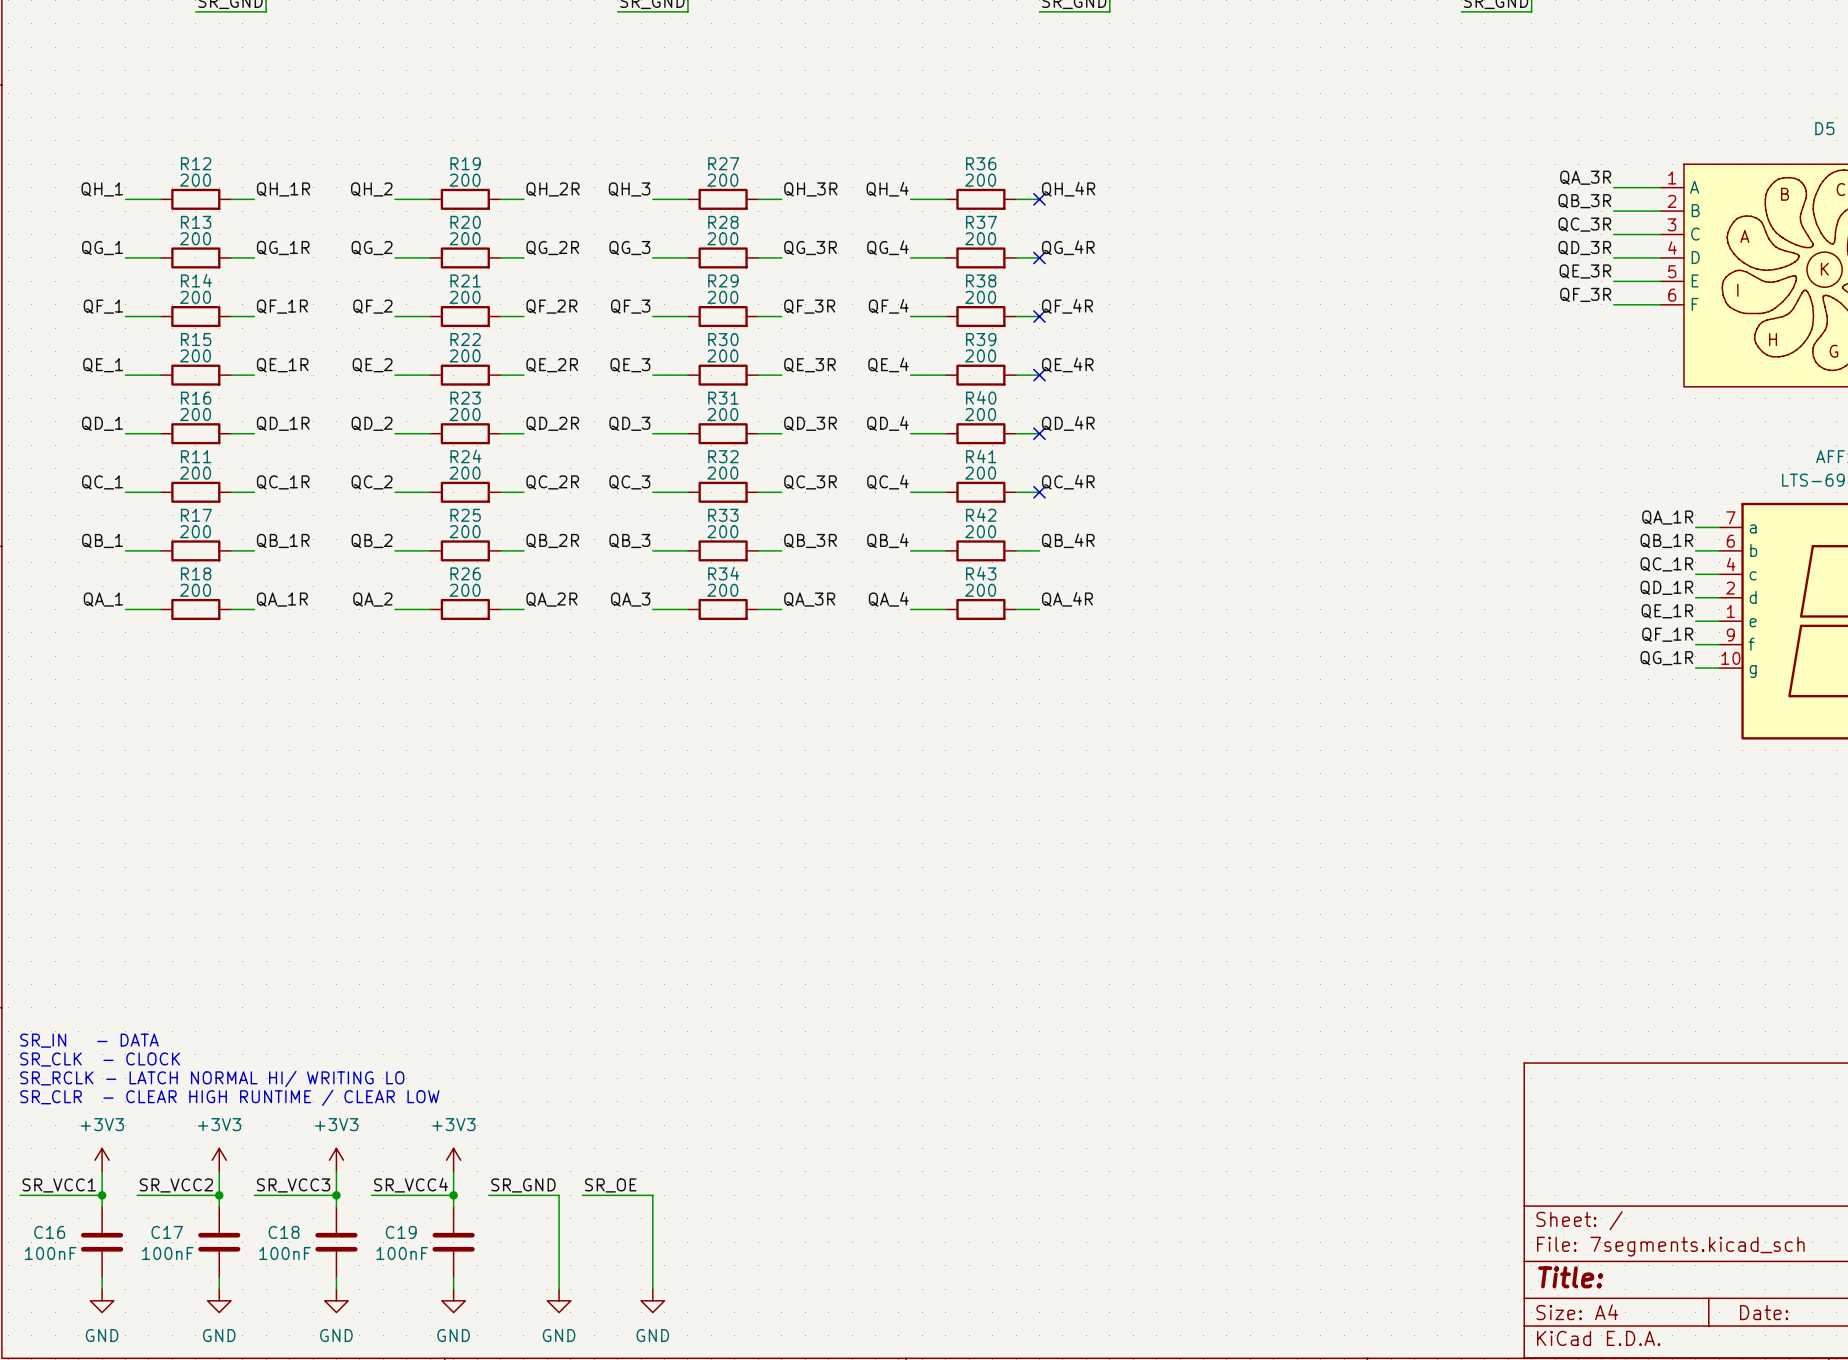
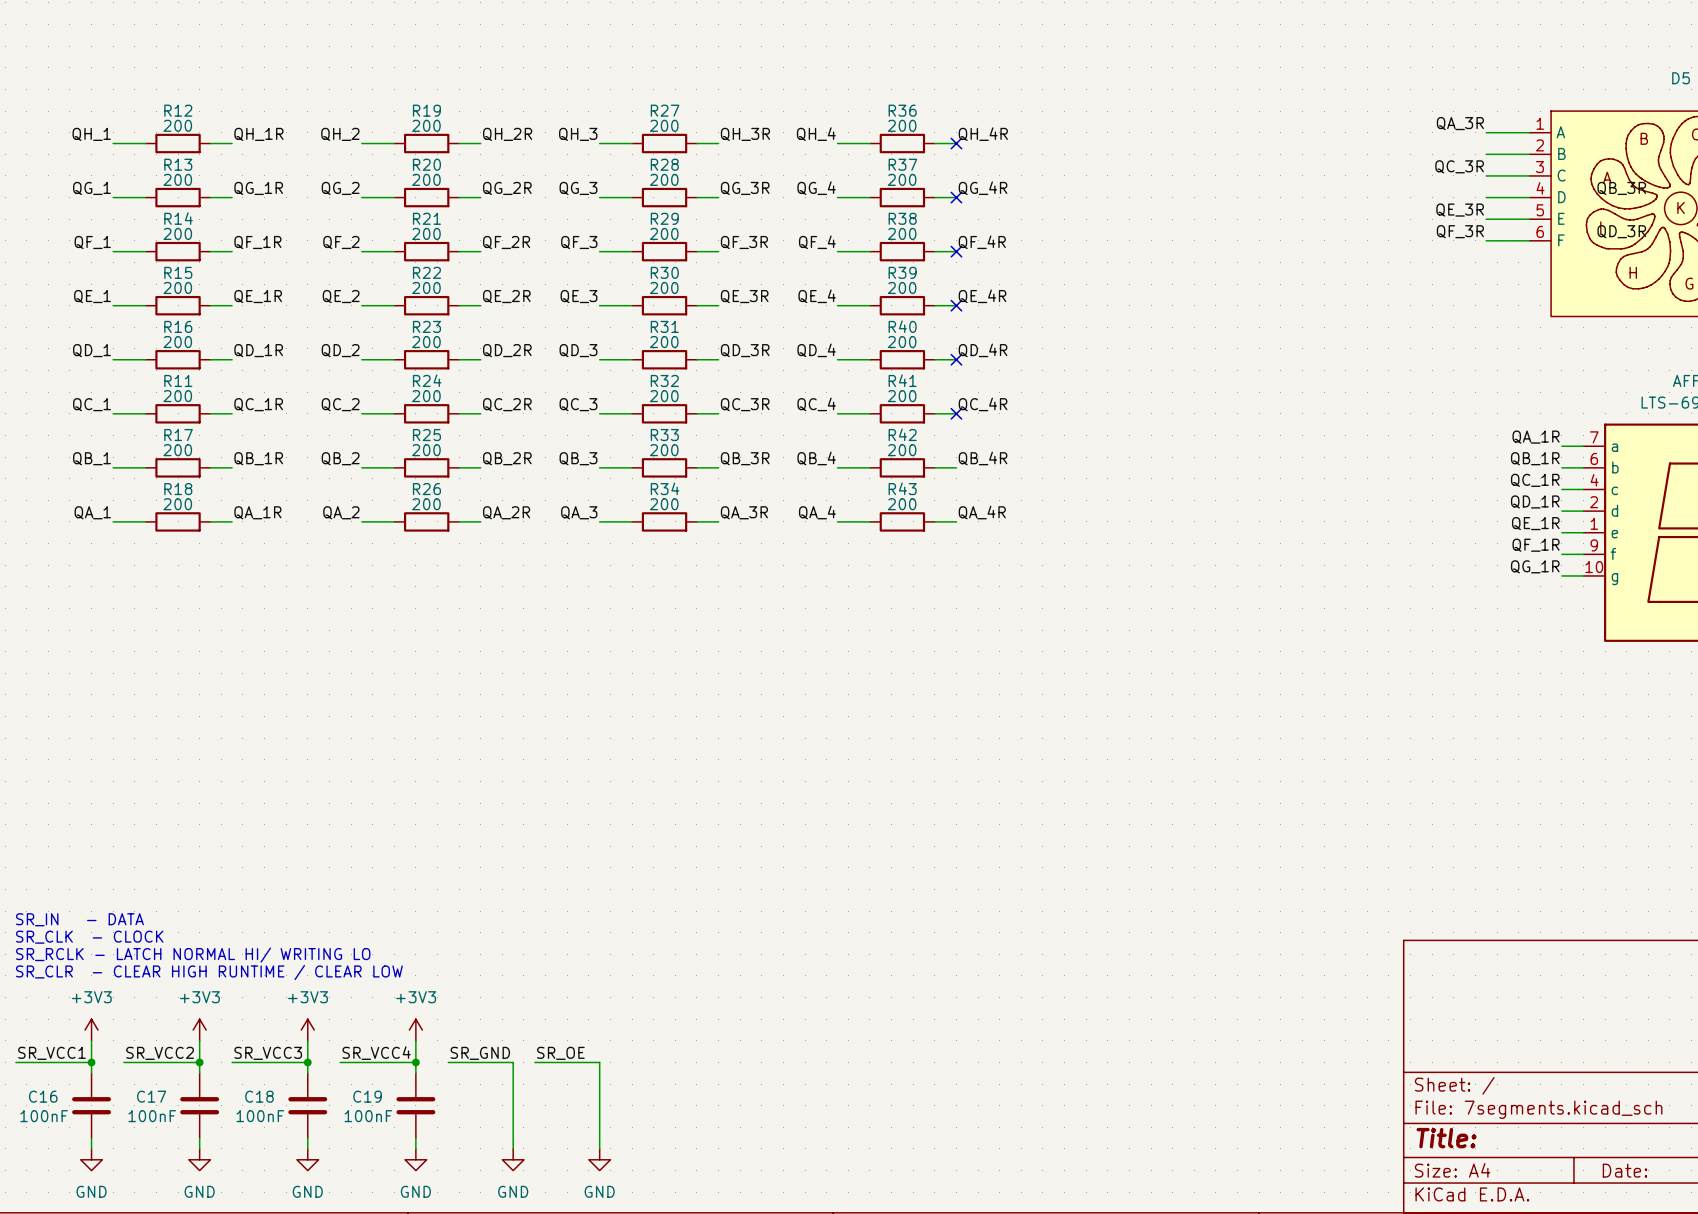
label position: QB_3R (1584, 201) -> QB_3R (1621, 188)
label position: QD_3R (1584, 248) -> QD_3R (1621, 231)

